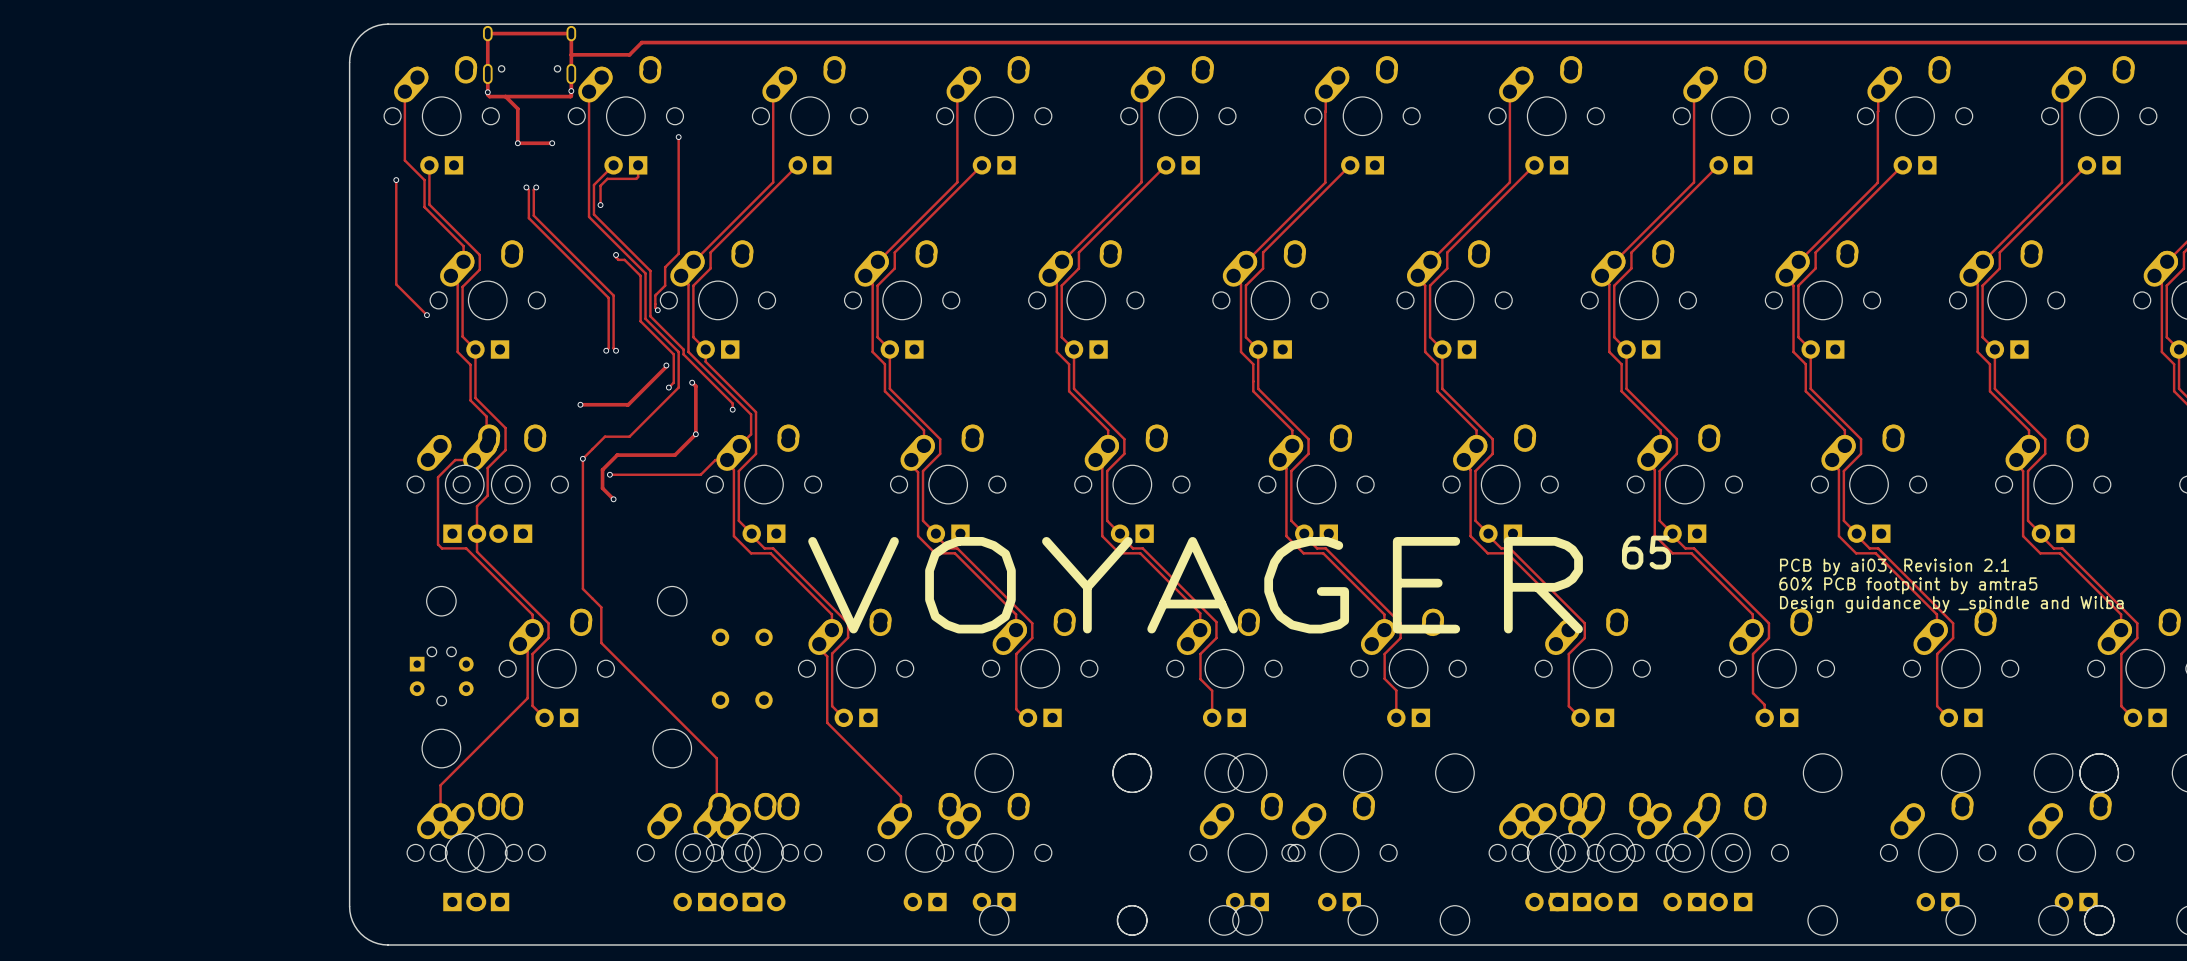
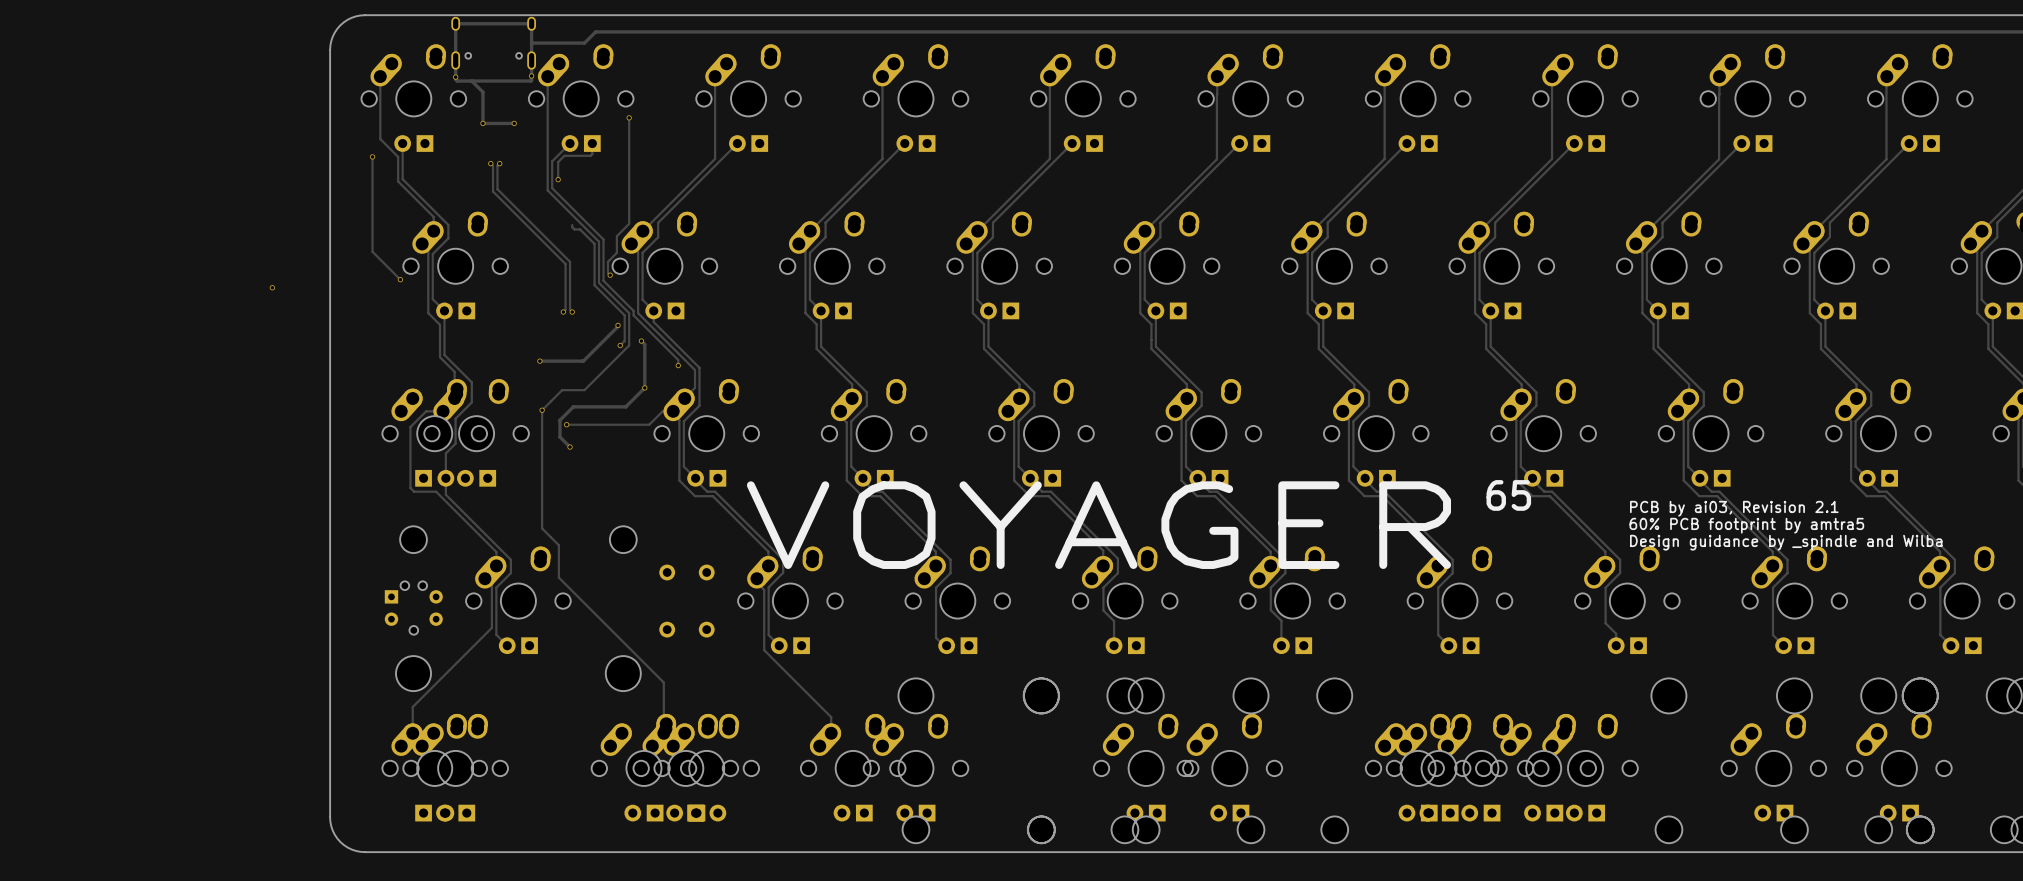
via: (616, 254) -> none
via: none -> (272, 287)

